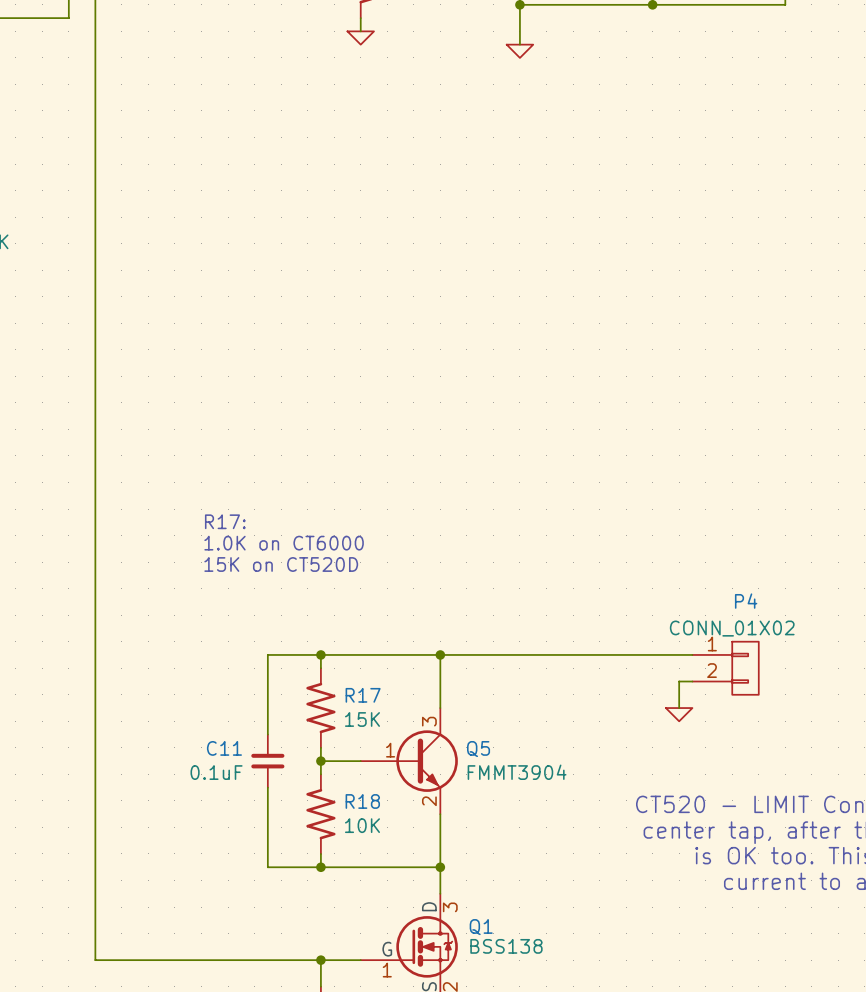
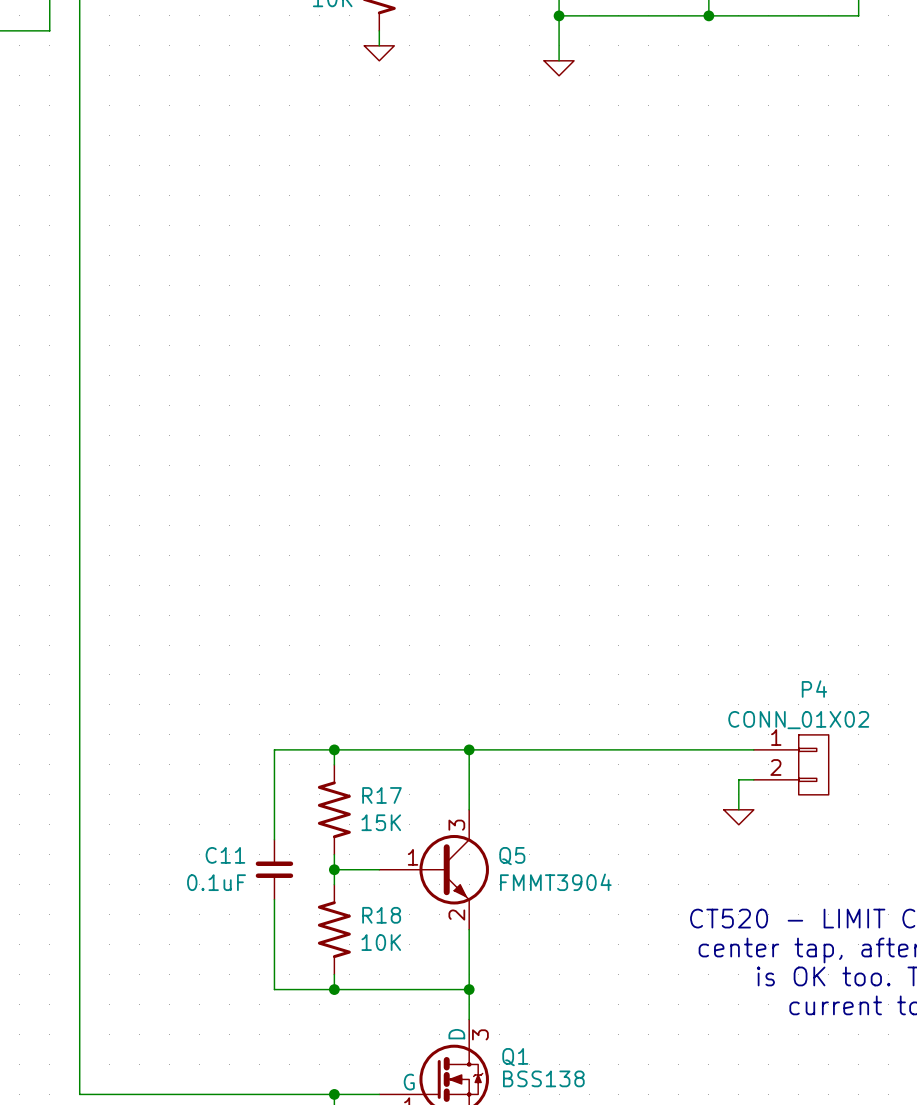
text: R17: (225, 521) -> none
text: 1.0K on CT6000 (284, 543) -> none
text: 15K on CT520D (281, 564) -> none

